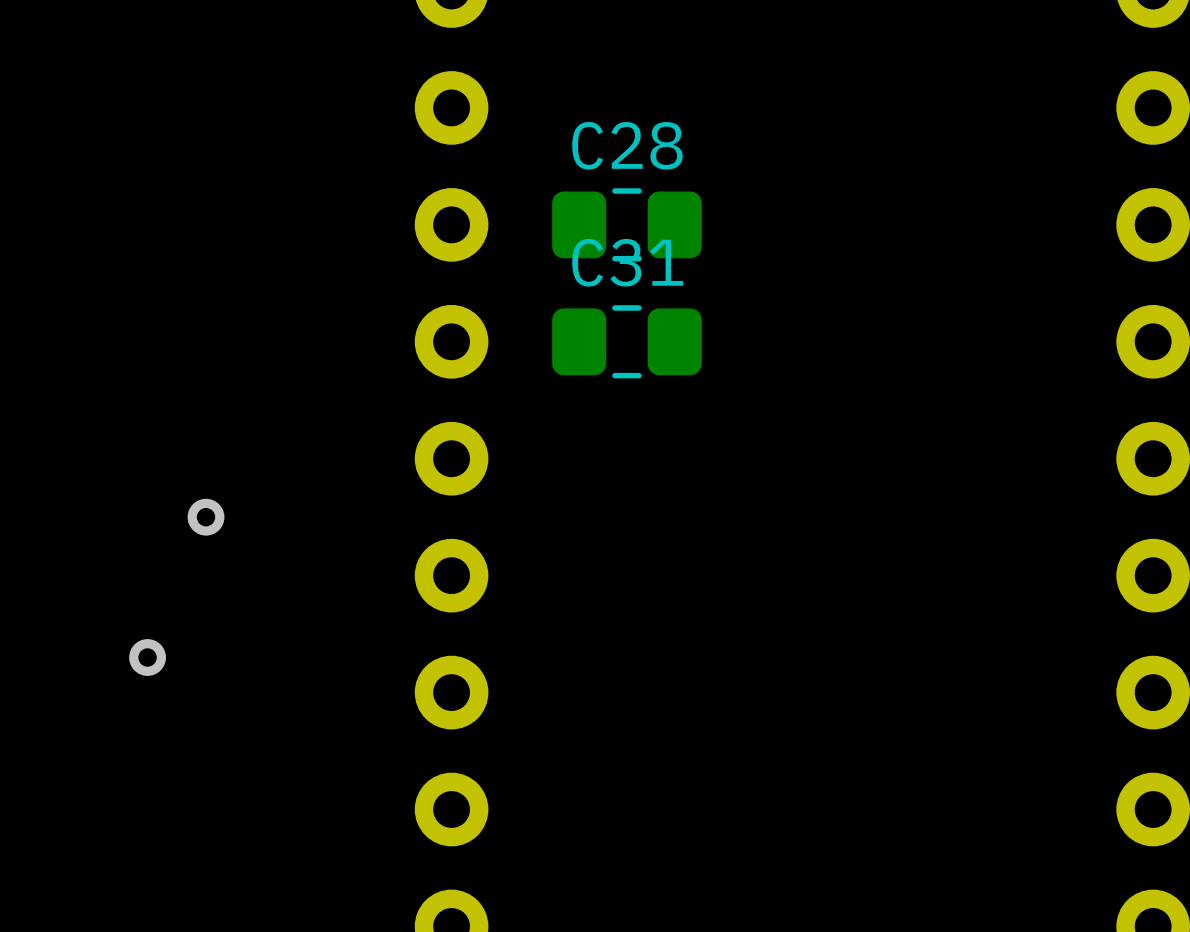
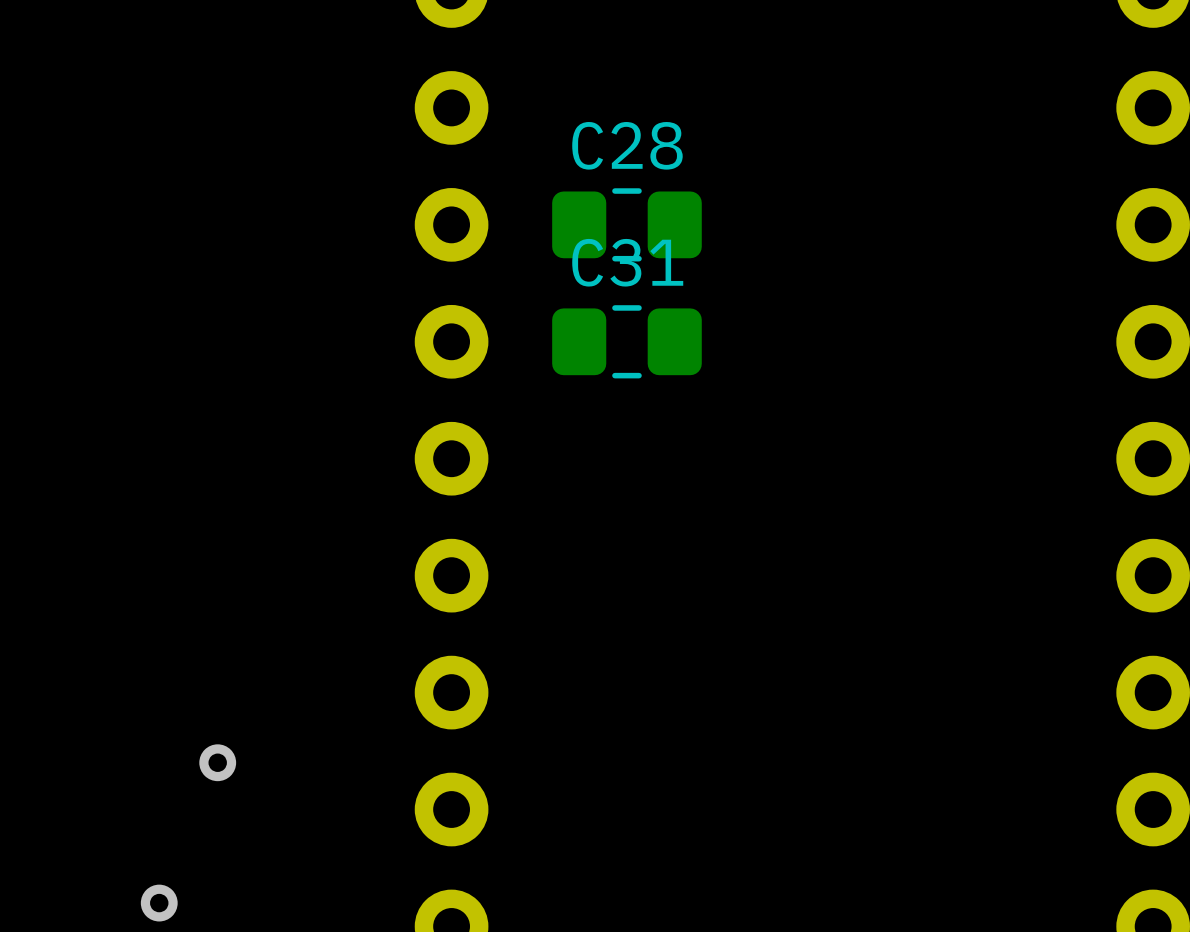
via: (206, 517) -> none
via: (147, 657) -> none
via: none -> (217, 762)
via: none -> (159, 903)

